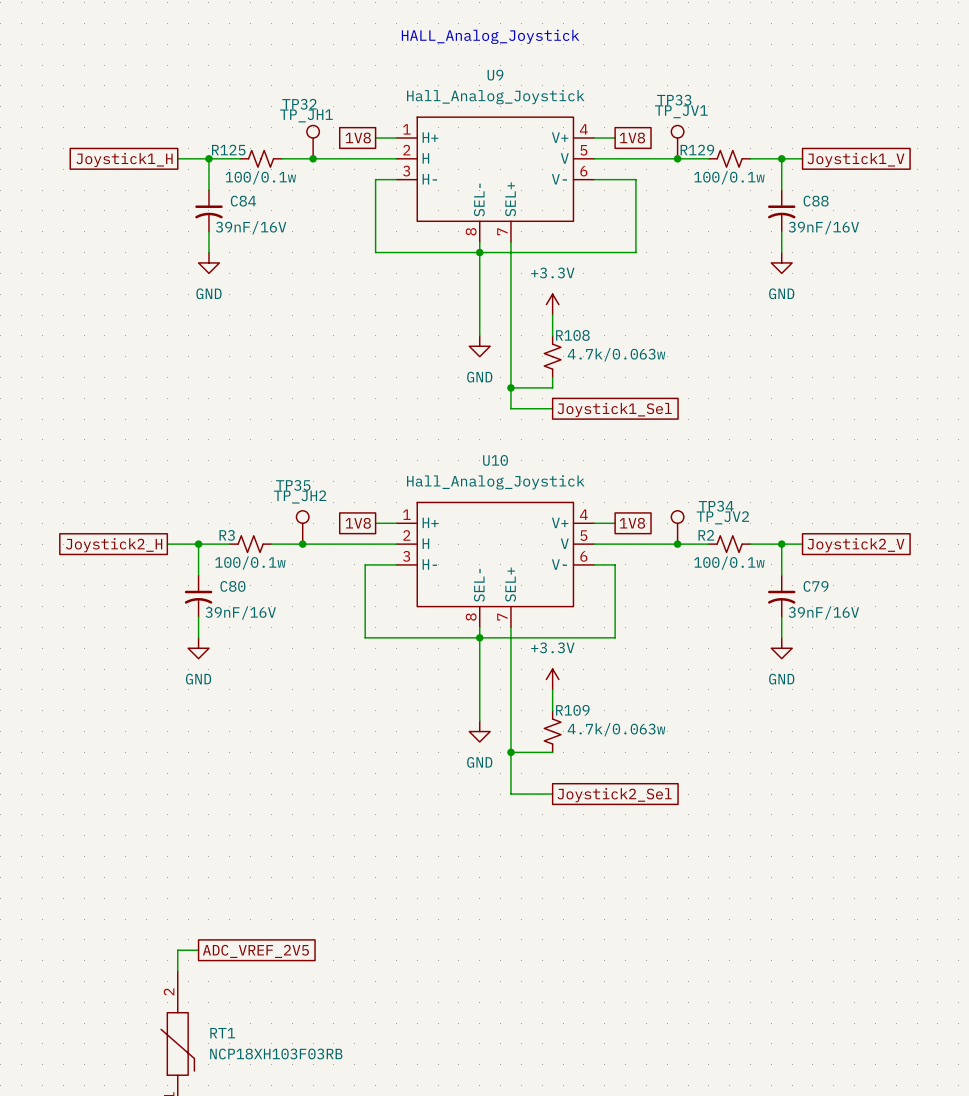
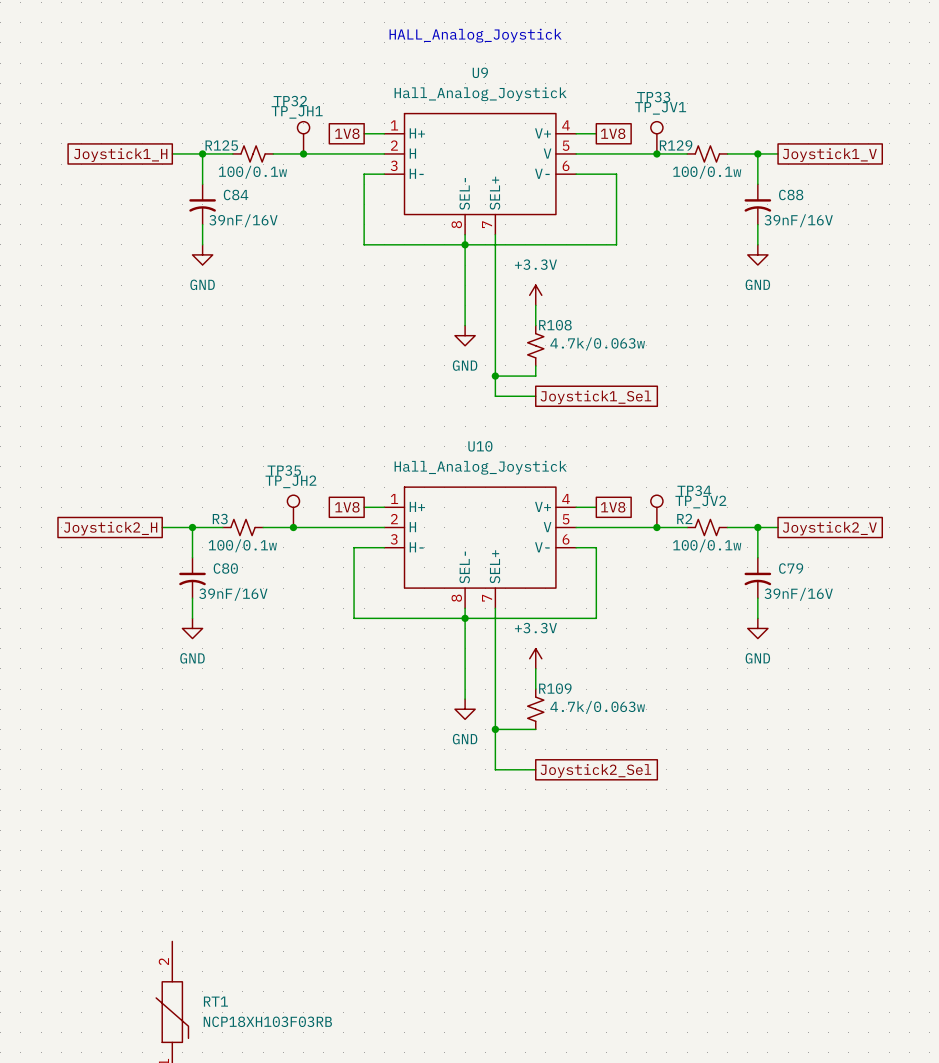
wire: (198, 950) (177, 950) (177, 971) -> none
global label: ADC_VREF_2V5 (255, 951) -> none

